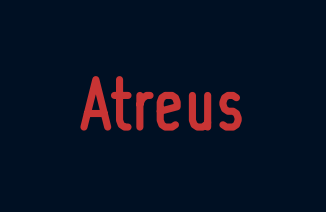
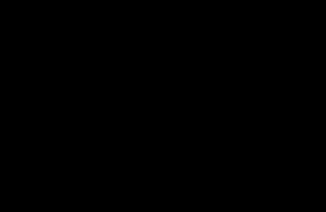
text: Atreus (161, 103) -> none

